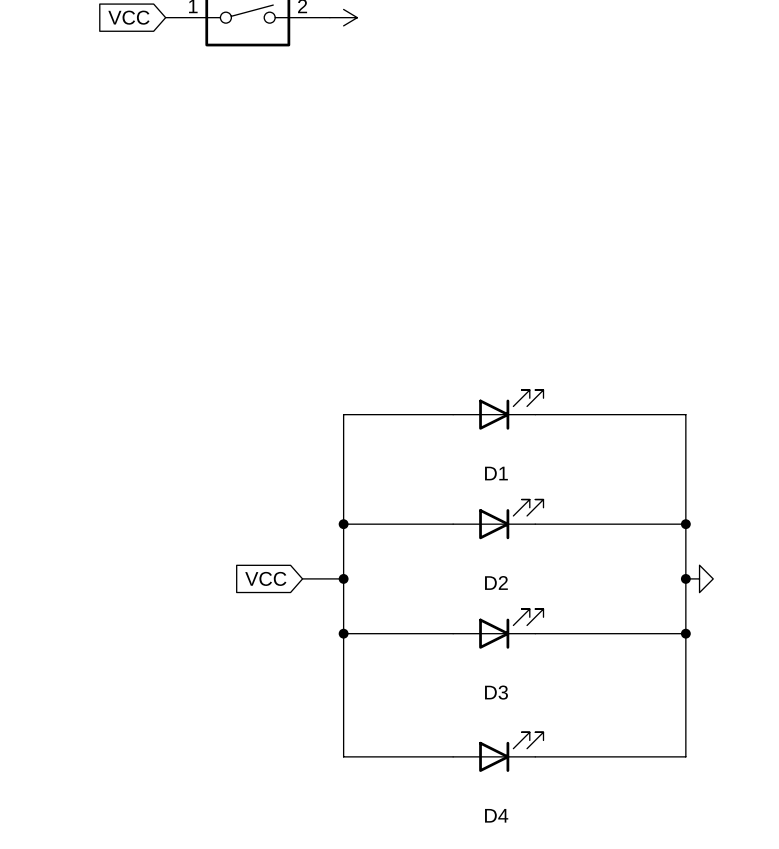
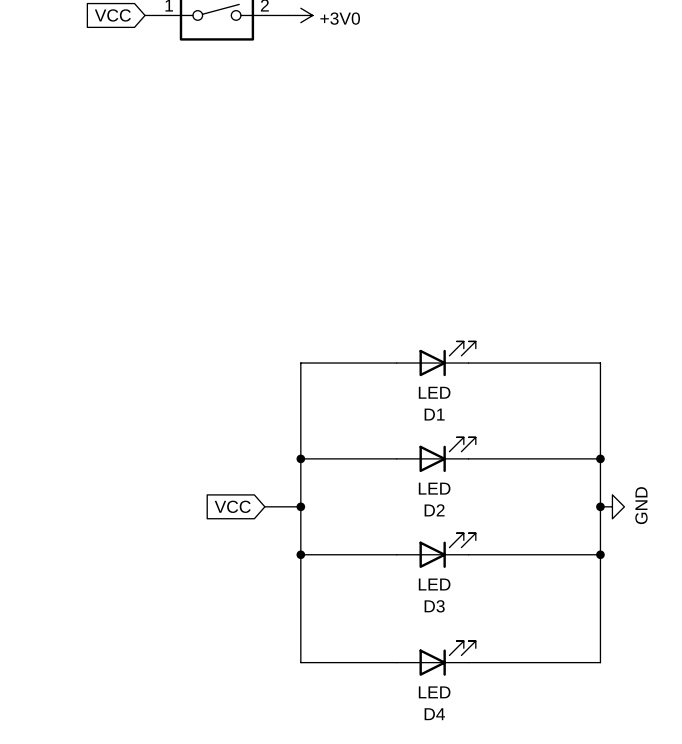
power symbol text: none -> +3V0 (340, 18)
D1 value: none -> LED (434, 392)
D2 value: none -> LED (434, 488)
power symbol text: none -> GND (641, 505)
D3 value: none -> LED (434, 584)
D4 value: none -> LED (434, 692)

